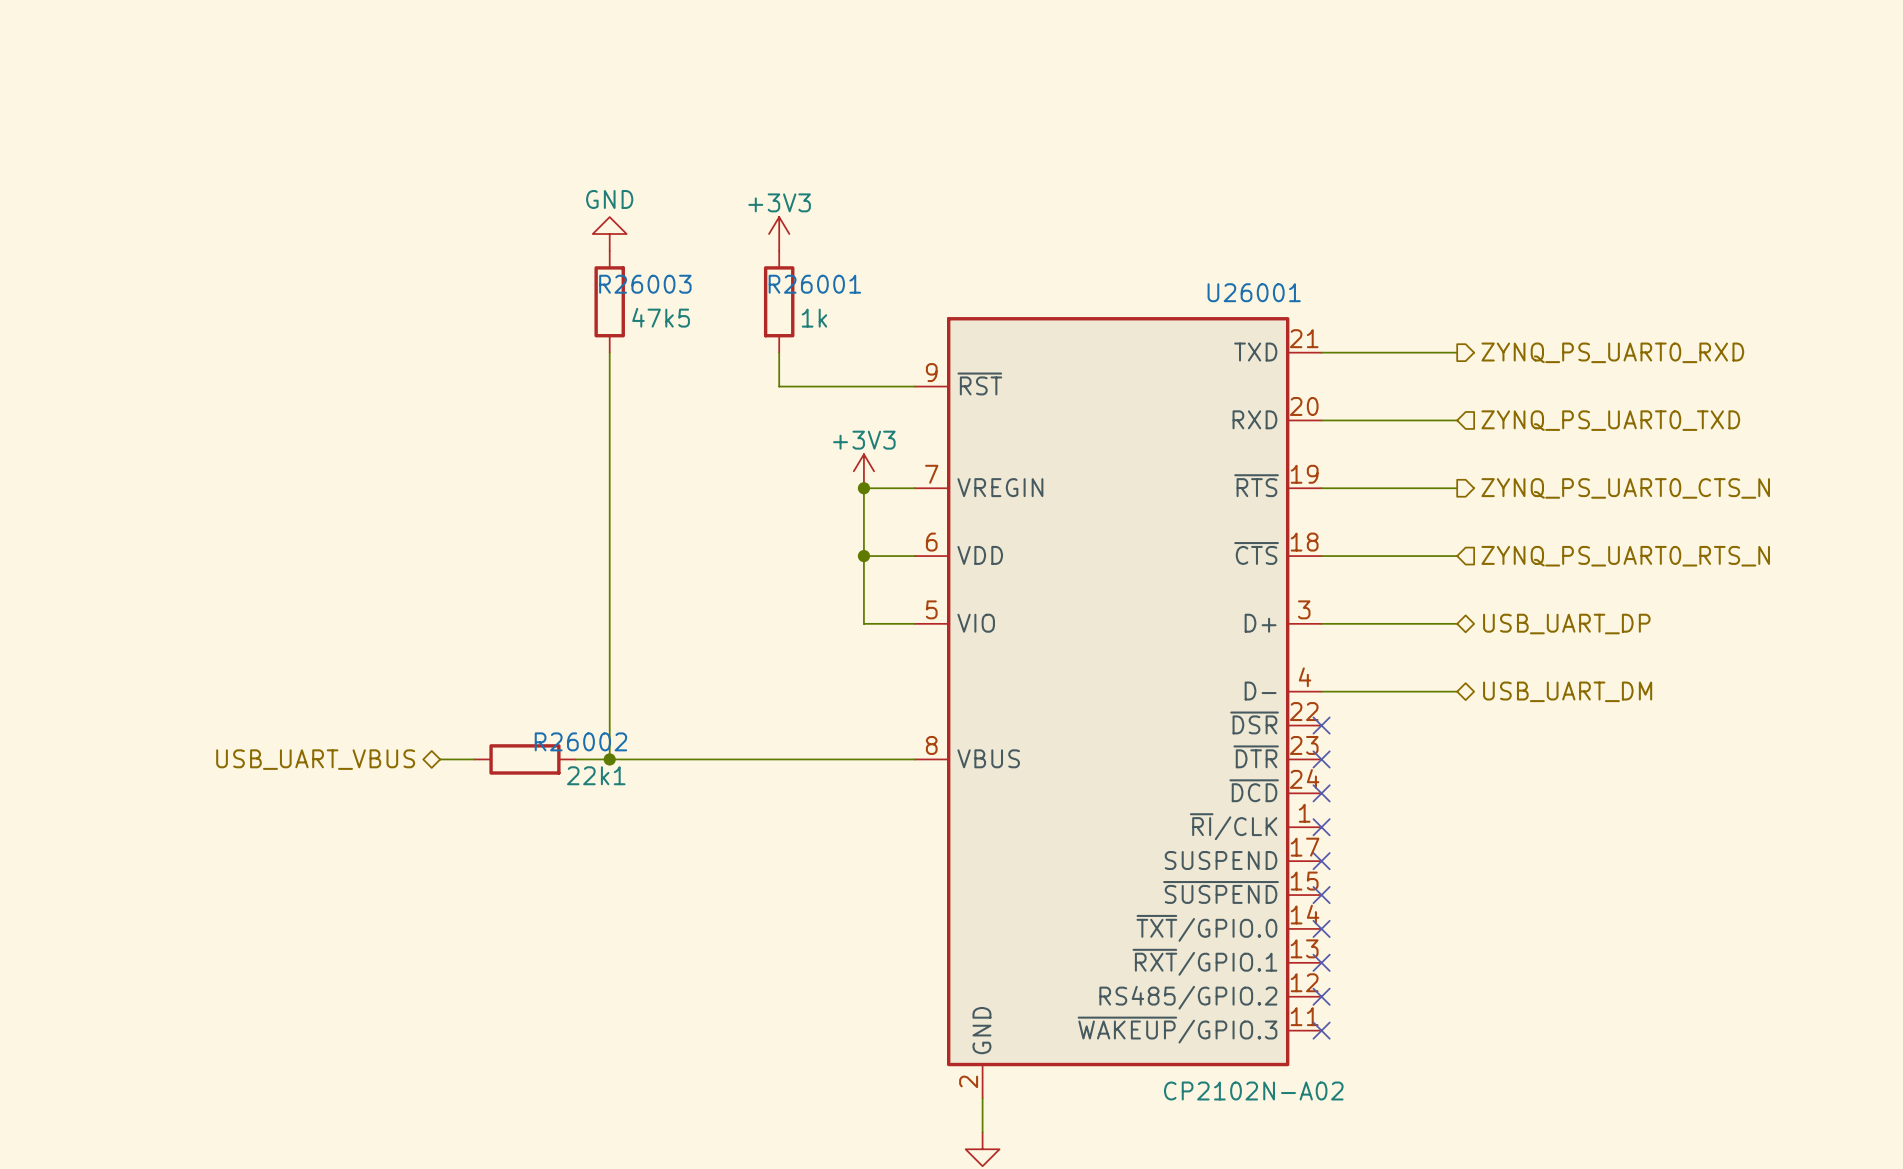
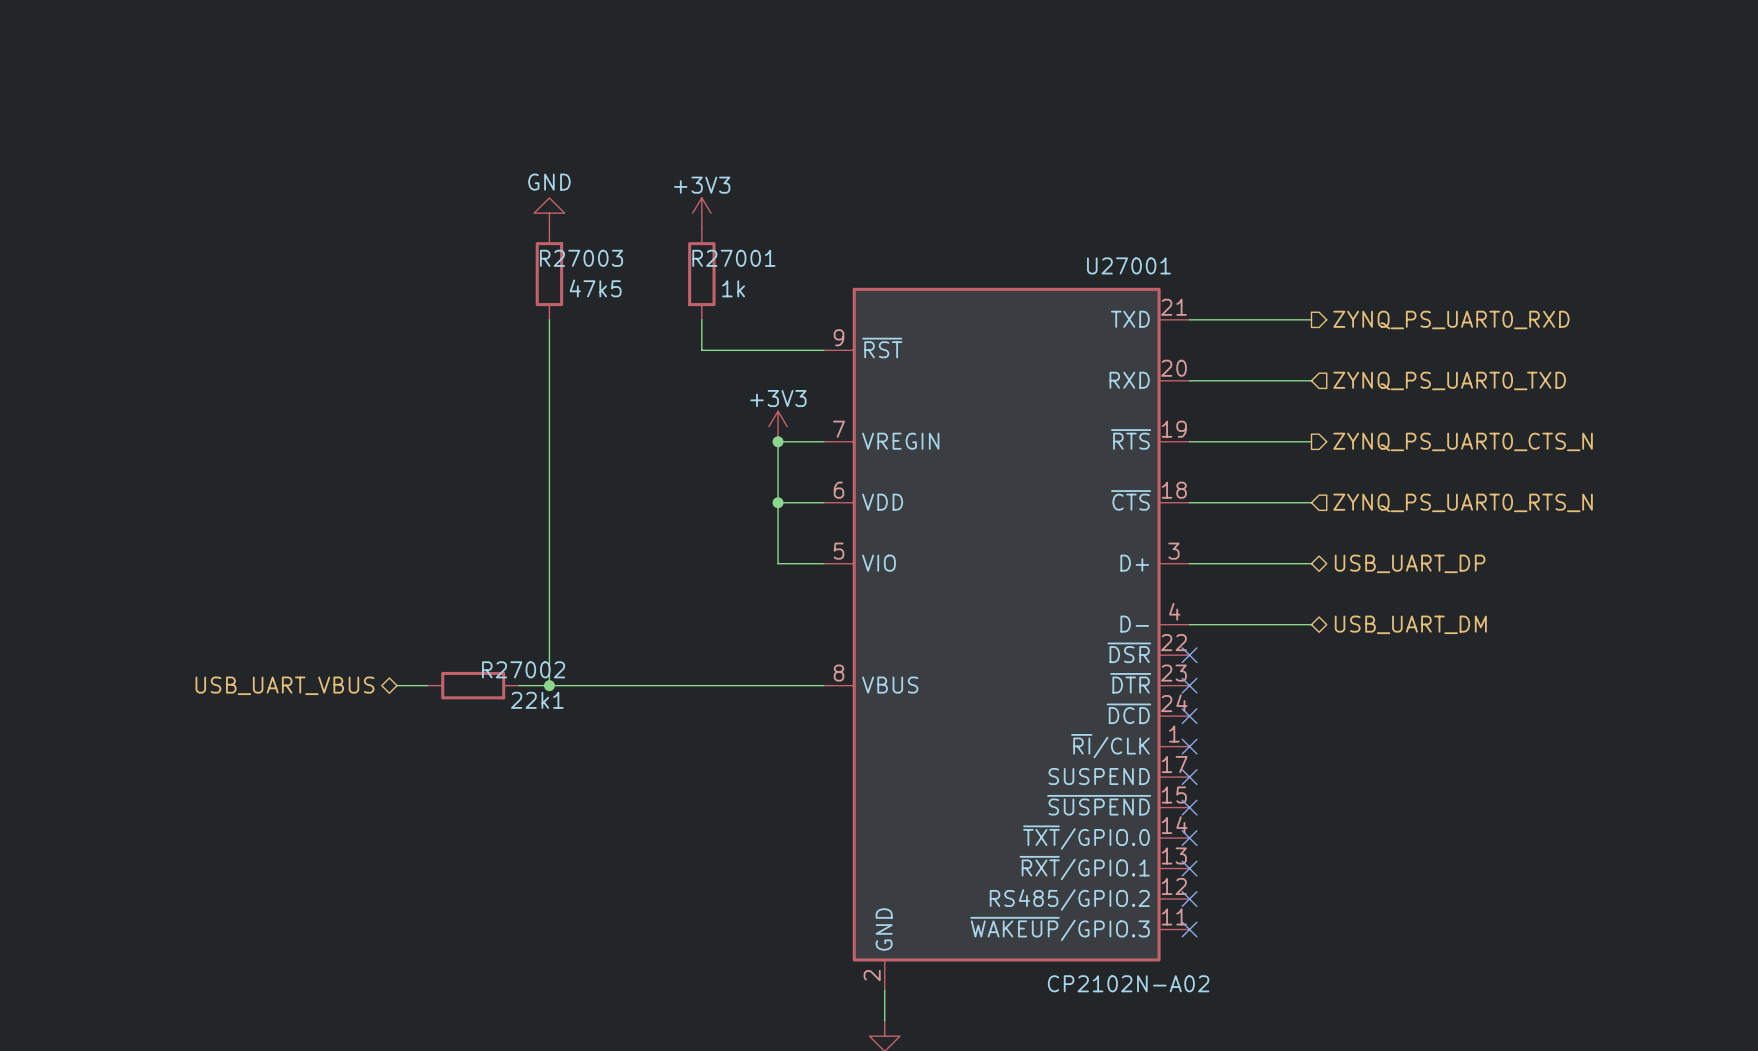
R26003 name: R26003 (645, 284) -> R27003 (581, 258)
R26001 name: R26001 (814, 284) -> R27001 (733, 258)
U26001 name: U26001 (1254, 292) -> U27001 (1128, 265)
R26002 name: R26002 (580, 741) -> R27002 (523, 669)

